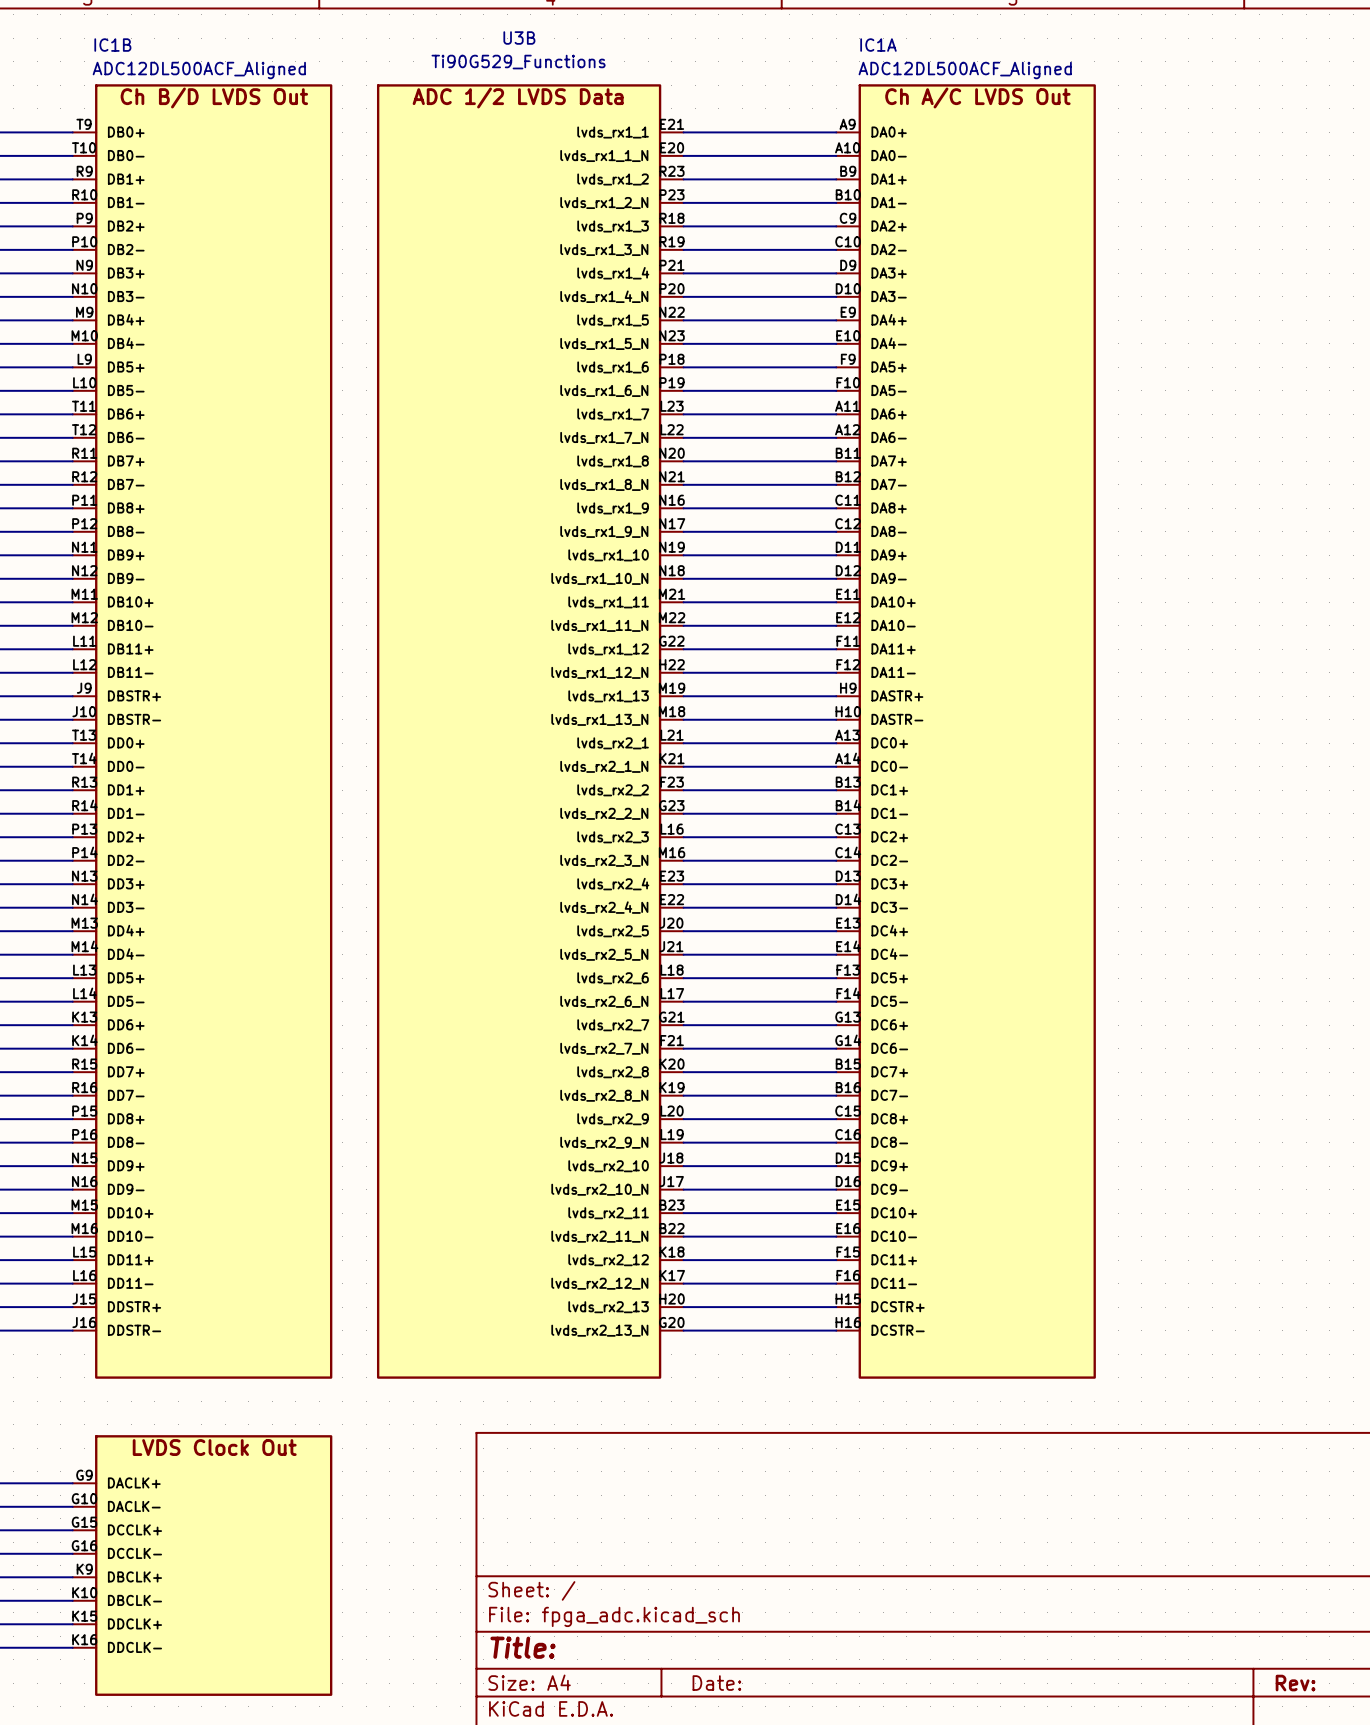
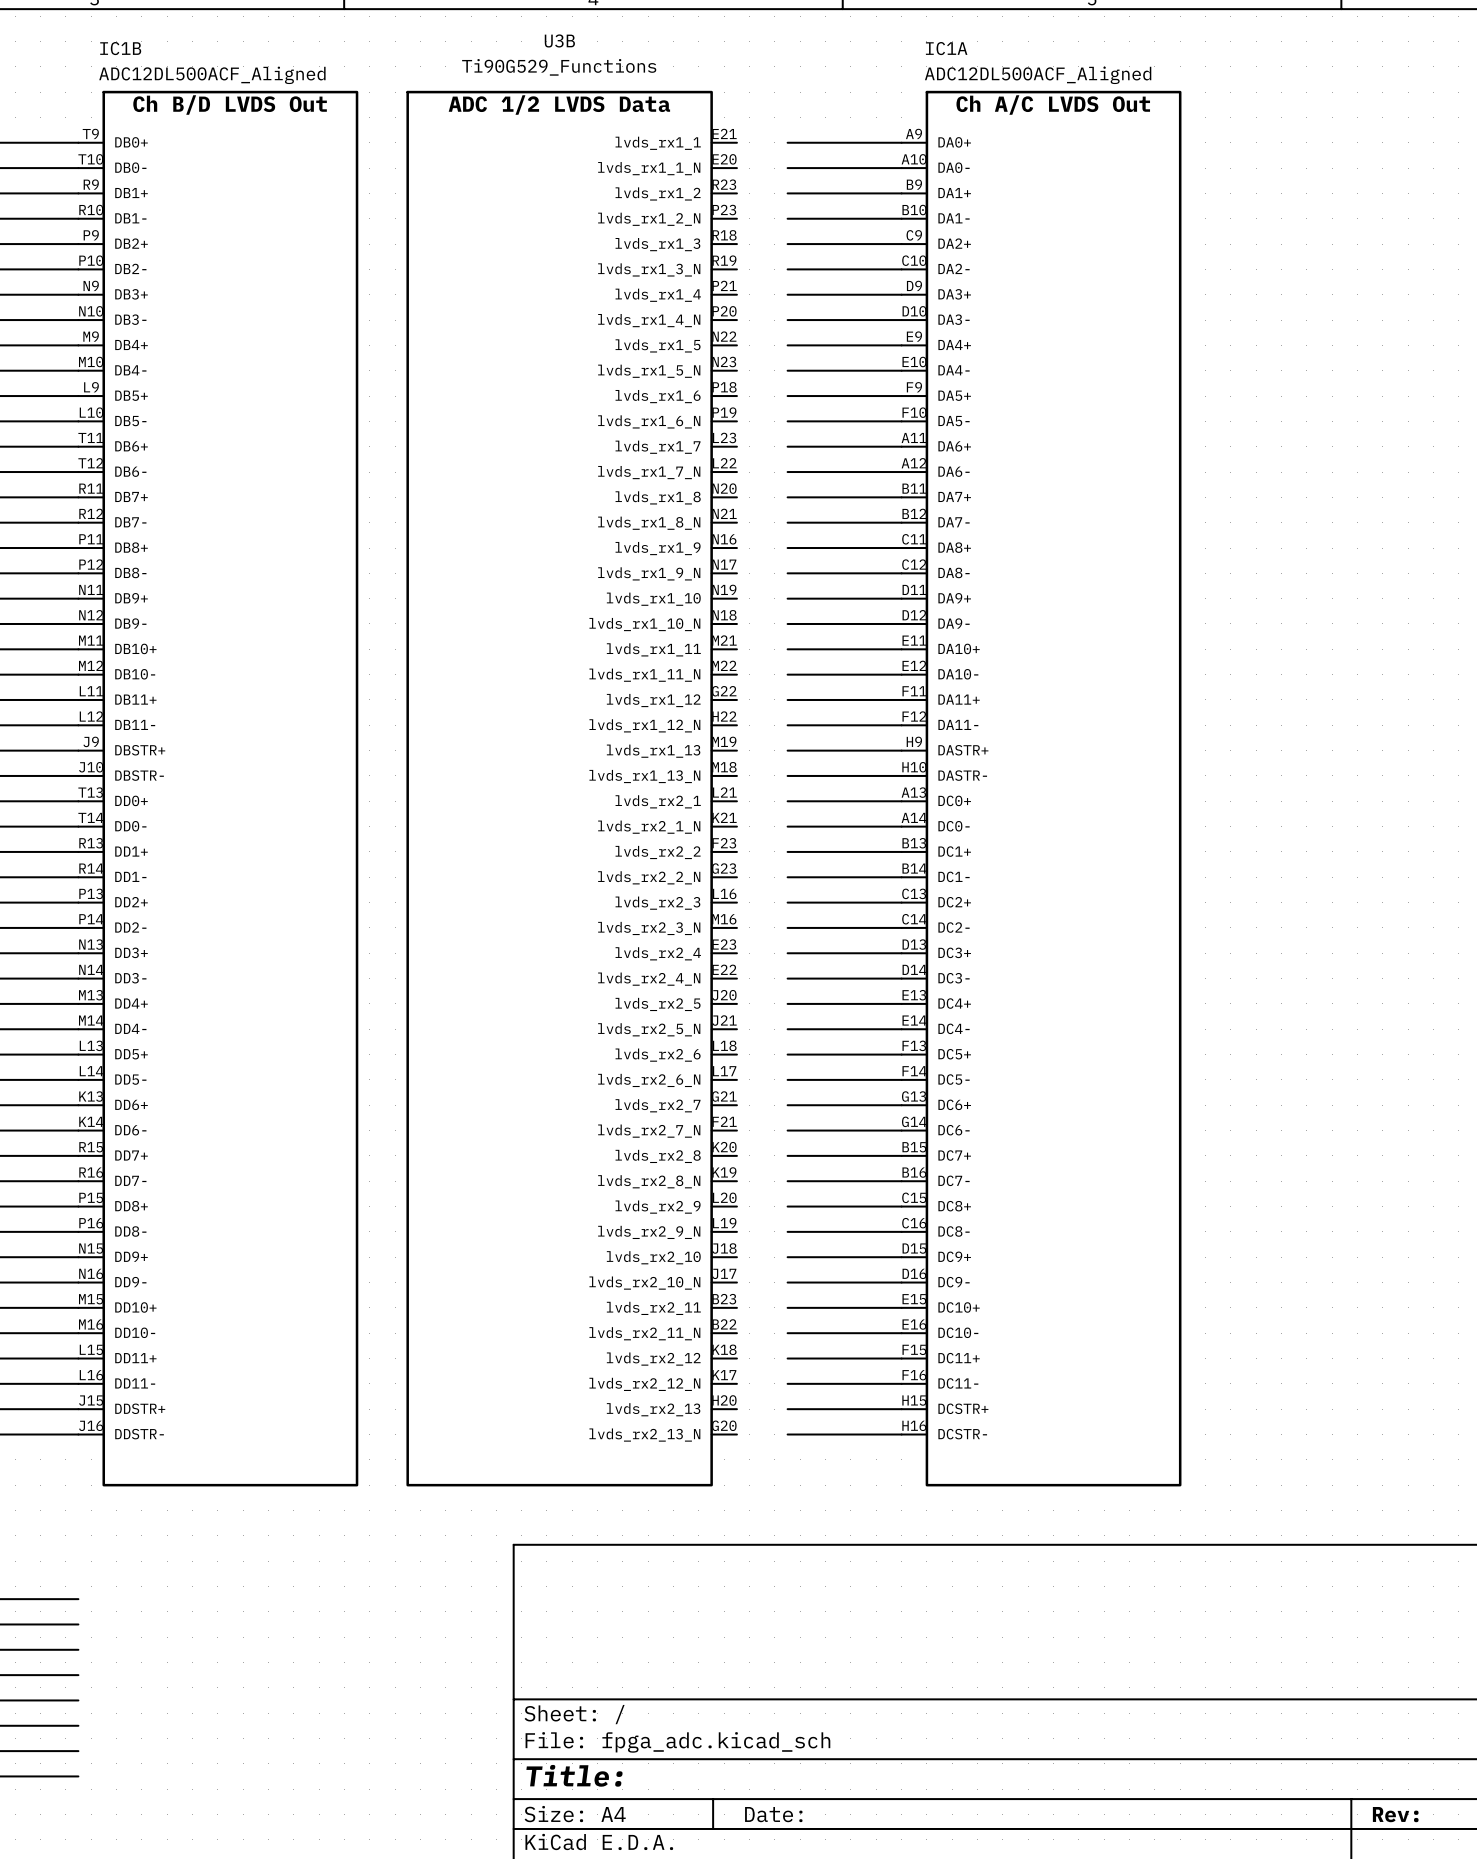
wire: (683, 132) (730, 132) -> none
wire: (683, 155) (730, 155) -> none
wire: (683, 179) (730, 179) -> none
wire: (683, 202) (730, 202) -> none
wire: (683, 226) (730, 226) -> none
wire: (683, 249) (730, 249) -> none
wire: (683, 273) (730, 273) -> none
wire: (683, 296) (730, 296) -> none
wire: (683, 320) (730, 320) -> none
wire: (683, 343) (730, 343) -> none
wire: (683, 367) (730, 367) -> none
wire: (683, 390) (730, 390) -> none
wire: (683, 414) (730, 414) -> none
wire: (683, 437) (730, 437) -> none
wire: (683, 461) (730, 461) -> none
wire: (683, 484) (730, 484) -> none
wire: (683, 508) (730, 508) -> none
wire: (683, 531) (730, 531) -> none
wire: (683, 555) (730, 555) -> none
wire: (683, 578) (730, 578) -> none
wire: (683, 602) (730, 602) -> none
wire: (683, 625) (730, 625) -> none
wire: (683, 649) (730, 649) -> none
wire: (683, 672) (730, 672) -> none
wire: (683, 696) (730, 696) -> none
wire: (683, 719) (730, 719) -> none
wire: (683, 743) (730, 743) -> none
wire: (683, 766) (730, 766) -> none
wire: (683, 790) (730, 790) -> none
wire: (683, 813) (730, 813) -> none
wire: (683, 837) (730, 837) -> none
wire: (683, 860) (730, 860) -> none
wire: (683, 884) (730, 884) -> none
wire: (683, 907) (730, 907) -> none
wire: (683, 931) (730, 931) -> none
wire: (683, 954) (730, 954) -> none
wire: (683, 978) (730, 978) -> none
wire: (683, 1001) (730, 1001) -> none
wire: (683, 1025) (730, 1025) -> none
wire: (683, 1048) (730, 1048) -> none
wire: (683, 1072) (730, 1072) -> none
wire: (683, 1095) (730, 1095) -> none
wire: (683, 1119) (730, 1119) -> none
wire: (683, 1142) (730, 1142) -> none
wire: (683, 1166) (730, 1166) -> none
wire: (683, 1189) (730, 1189) -> none
wire: (683, 1213) (730, 1213) -> none
wire: (683, 1236) (730, 1236) -> none
wire: (683, 1260) (730, 1260) -> none
wire: (683, 1283) (730, 1283) -> none
wire: (683, 1307) (730, 1307) -> none
wire: (683, 1330) (730, 1330) -> none
part: (202, 1565) -> none

